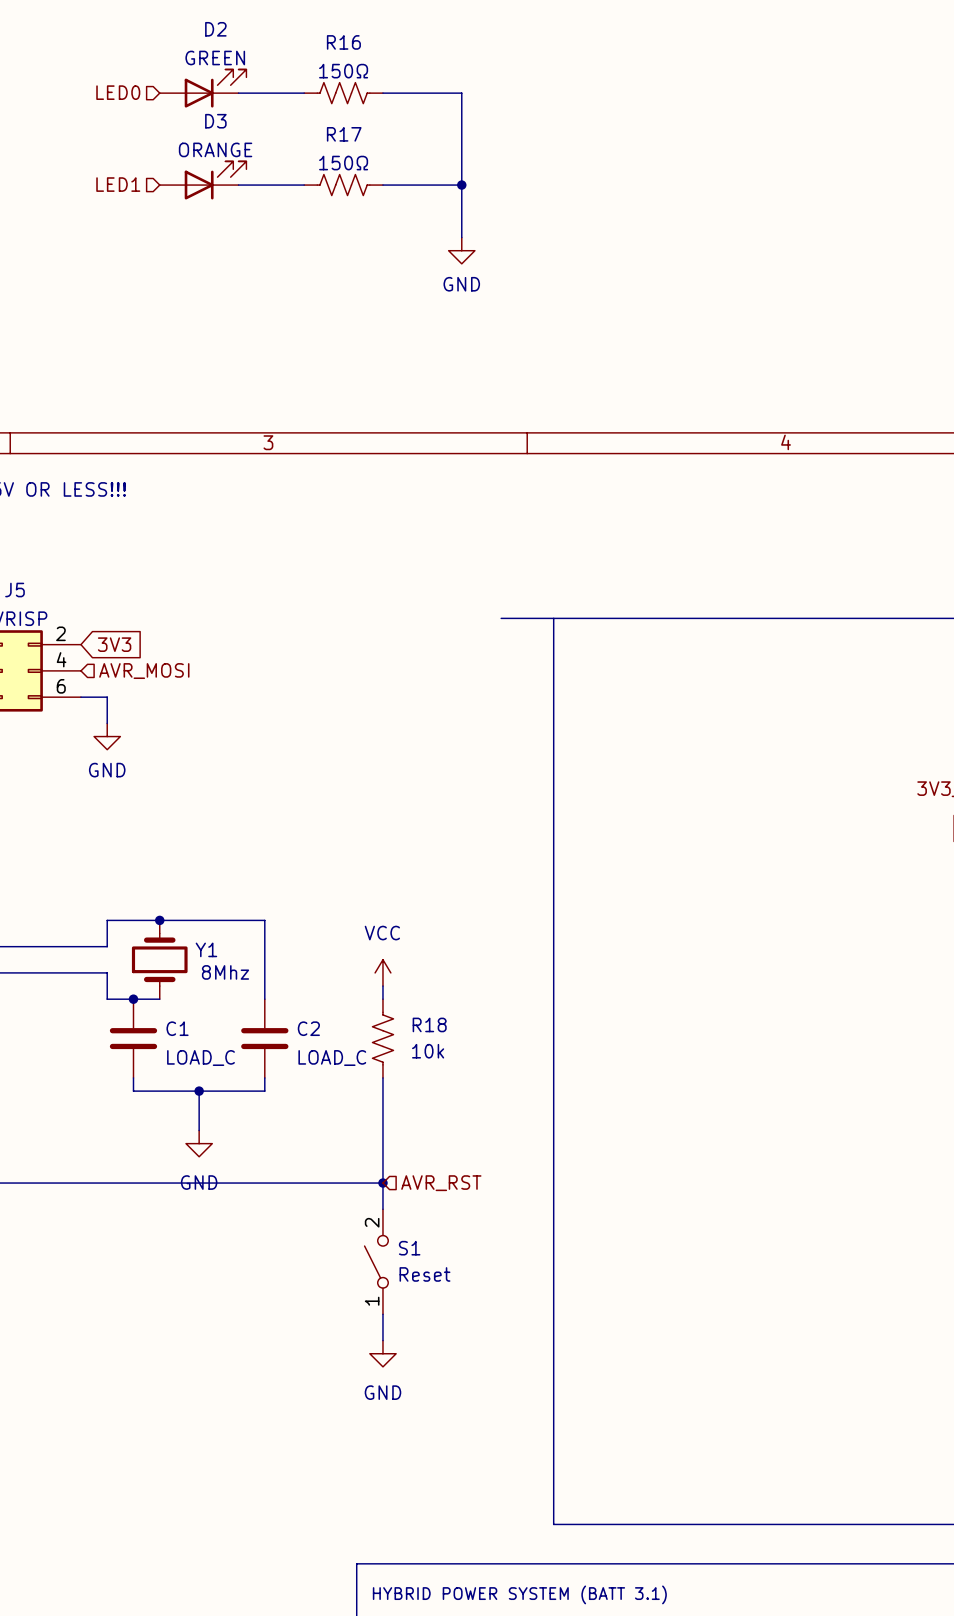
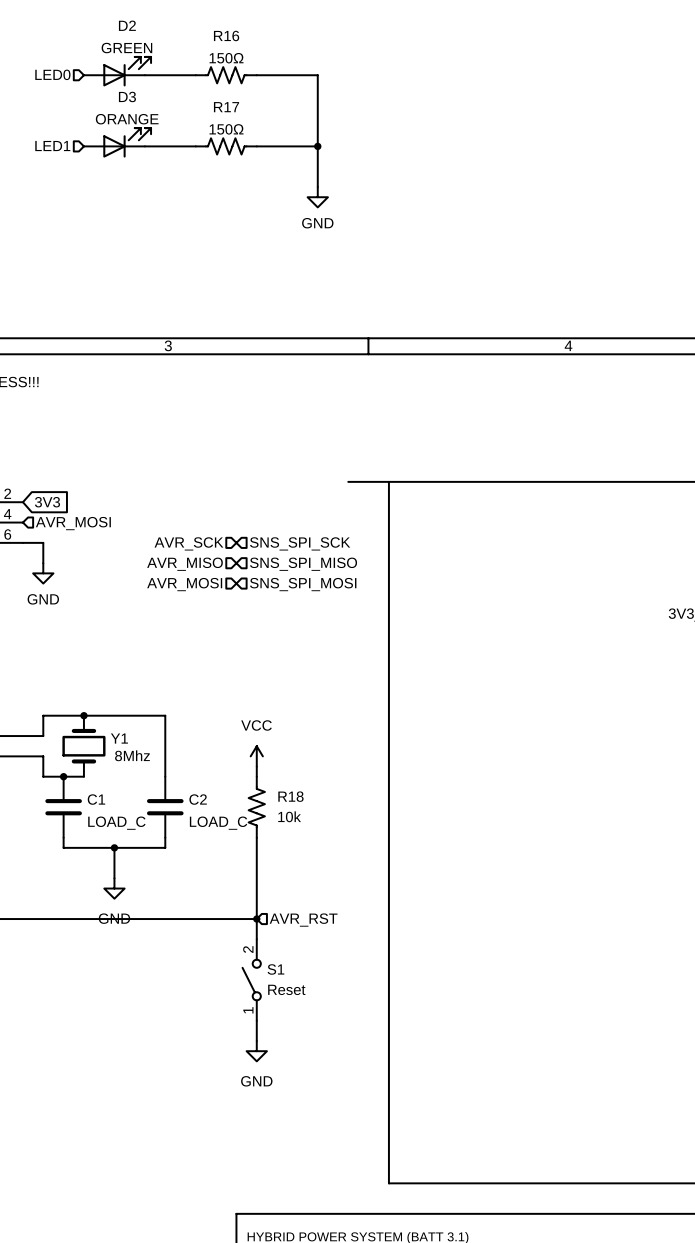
hierarchical label: none -> AVR_SCK (188, 543)
hierarchical label: none -> SNS_SPI_SCK (300, 543)
hierarchical label: none -> AVR_MISO (185, 564)
hierarchical label: none -> SNS_SPI_MISO (303, 564)
hierarchical label: none -> AVR_MOSI (184, 584)
hierarchical label: none -> SNS_SPI_MOSI (303, 584)

